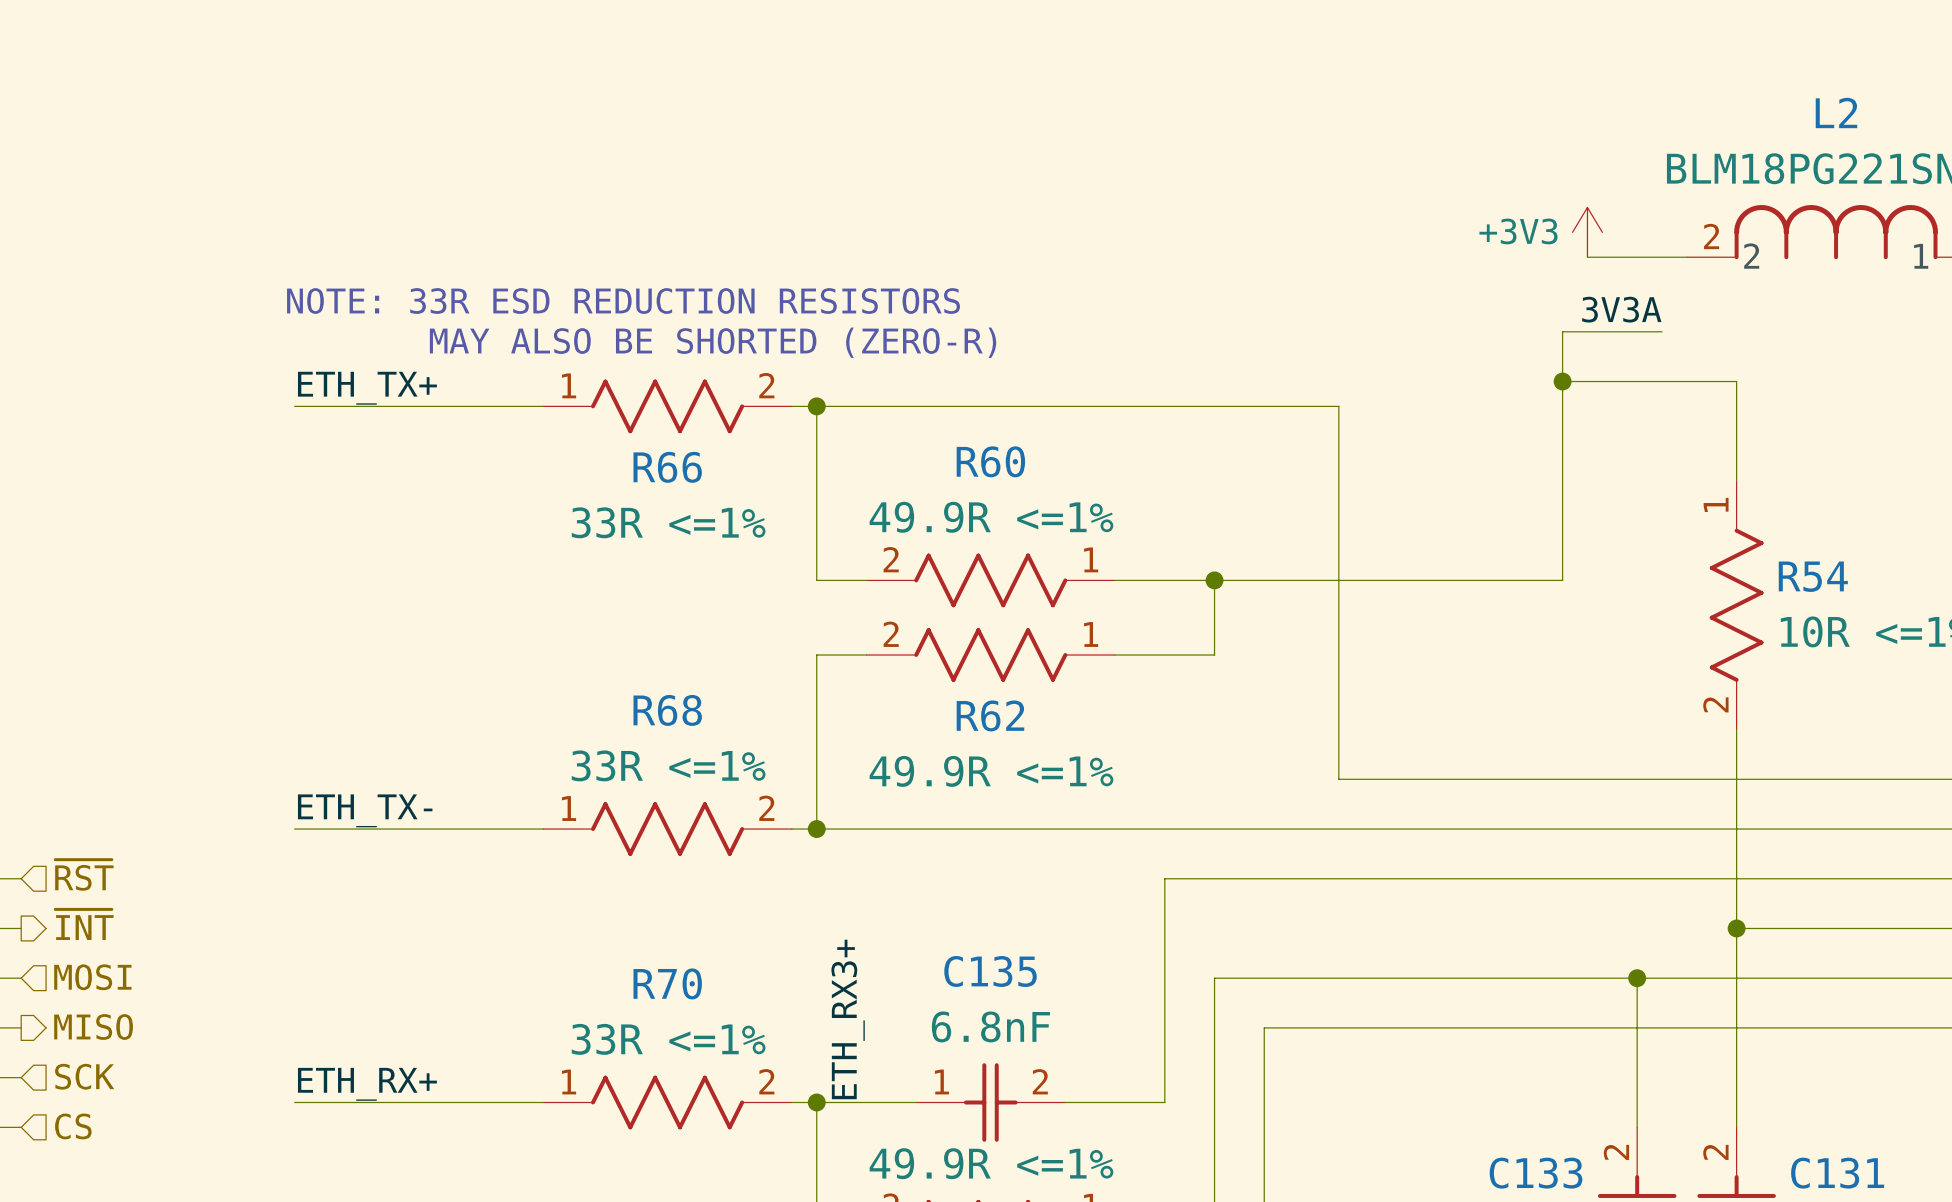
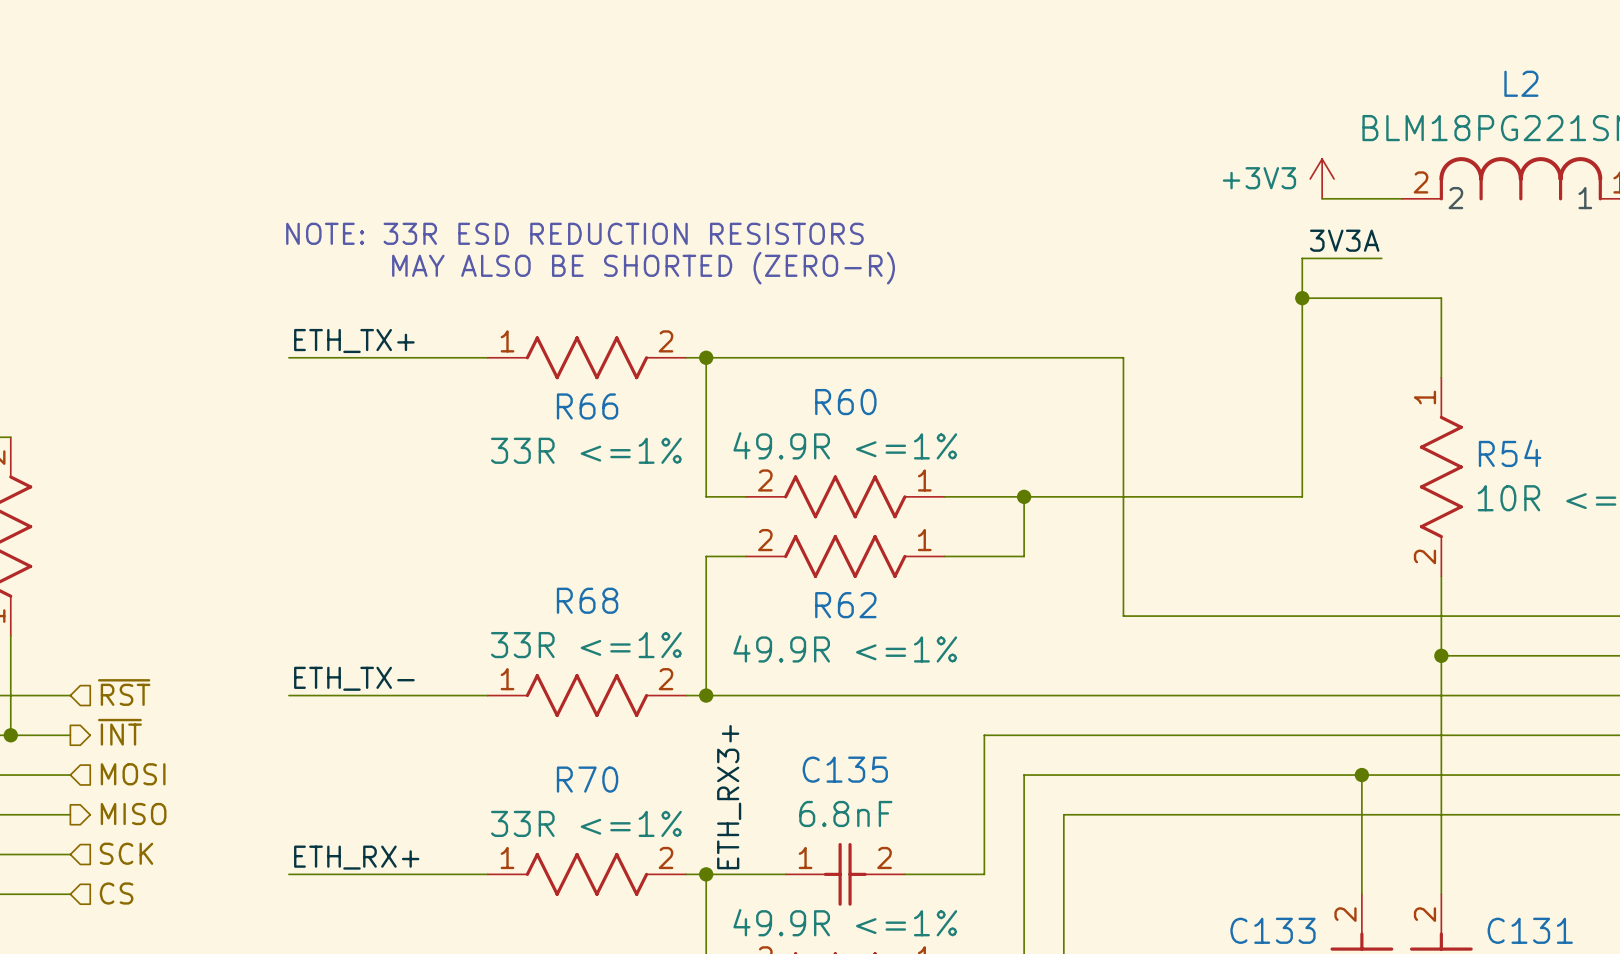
label position: ETH_TX+ (367, 388) -> ETH_TX+ (354, 340)
wire: (294, 406) (543, 406) -> (288, 357) (487, 357)
R66 position: (667, 406) -> (586, 357)
wire: (791, 406) (1338, 406) (1338, 456) -> (686, 357) (1123, 357)
wire: (816, 406) (816, 456) -> (706, 655) (706, 695)
junction position: (816, 406) -> (706, 357)
wire: (816, 580) (866, 580) -> (706, 457) (706, 496) (745, 496)
R60 position: (990, 580) -> (845, 496)
wire: (1115, 580) (1562, 580) -> (944, 496) (1302, 496) (1302, 457)
wire: (1214, 580) (1214, 630) -> none
junction position: (1214, 580) -> (1024, 496)
wire: (866, 655) (816, 655) (816, 704) -> (745, 556) (706, 556)
R62 position: (990, 655) -> (845, 556)
wire: (1115, 655) (1214, 655) -> (944, 556) (1024, 556) (1024, 516)
label position: ETH_TX- (365, 810) -> ETH_TX- (354, 678)
wire: (294, 829) (543, 829) -> (288, 695) (487, 695)
R68 position: (667, 829) -> (586, 695)
wire: (791, 829) (1736, 829) -> none
junction position: (816, 829) -> (706, 695)
wire: (1164, 878) (1164, 928) -> (984, 695) (686, 695)
wire: none -> (984, 735) (1441, 735)
junction position: (1736, 928) -> (1441, 655)

